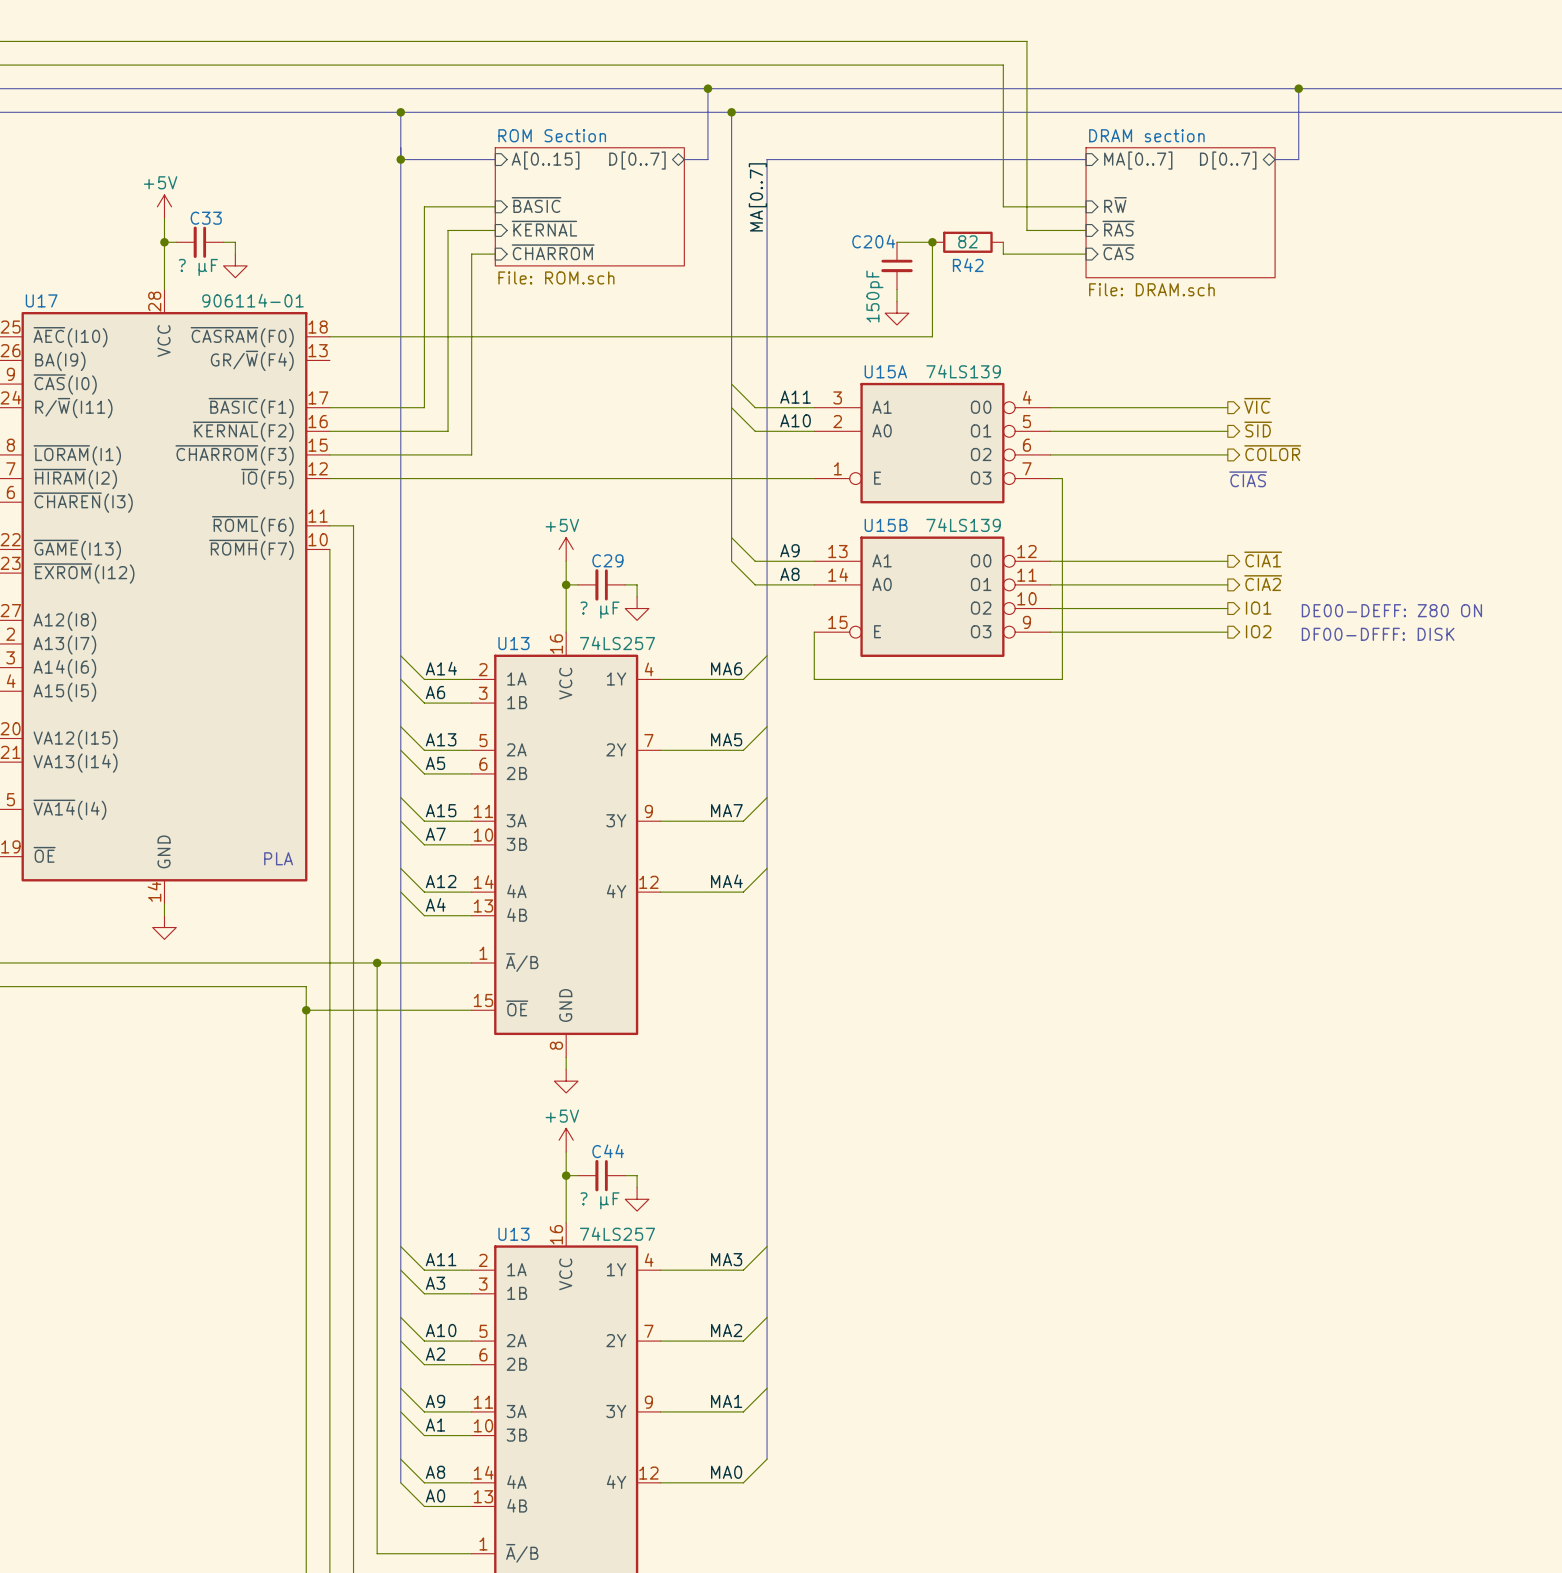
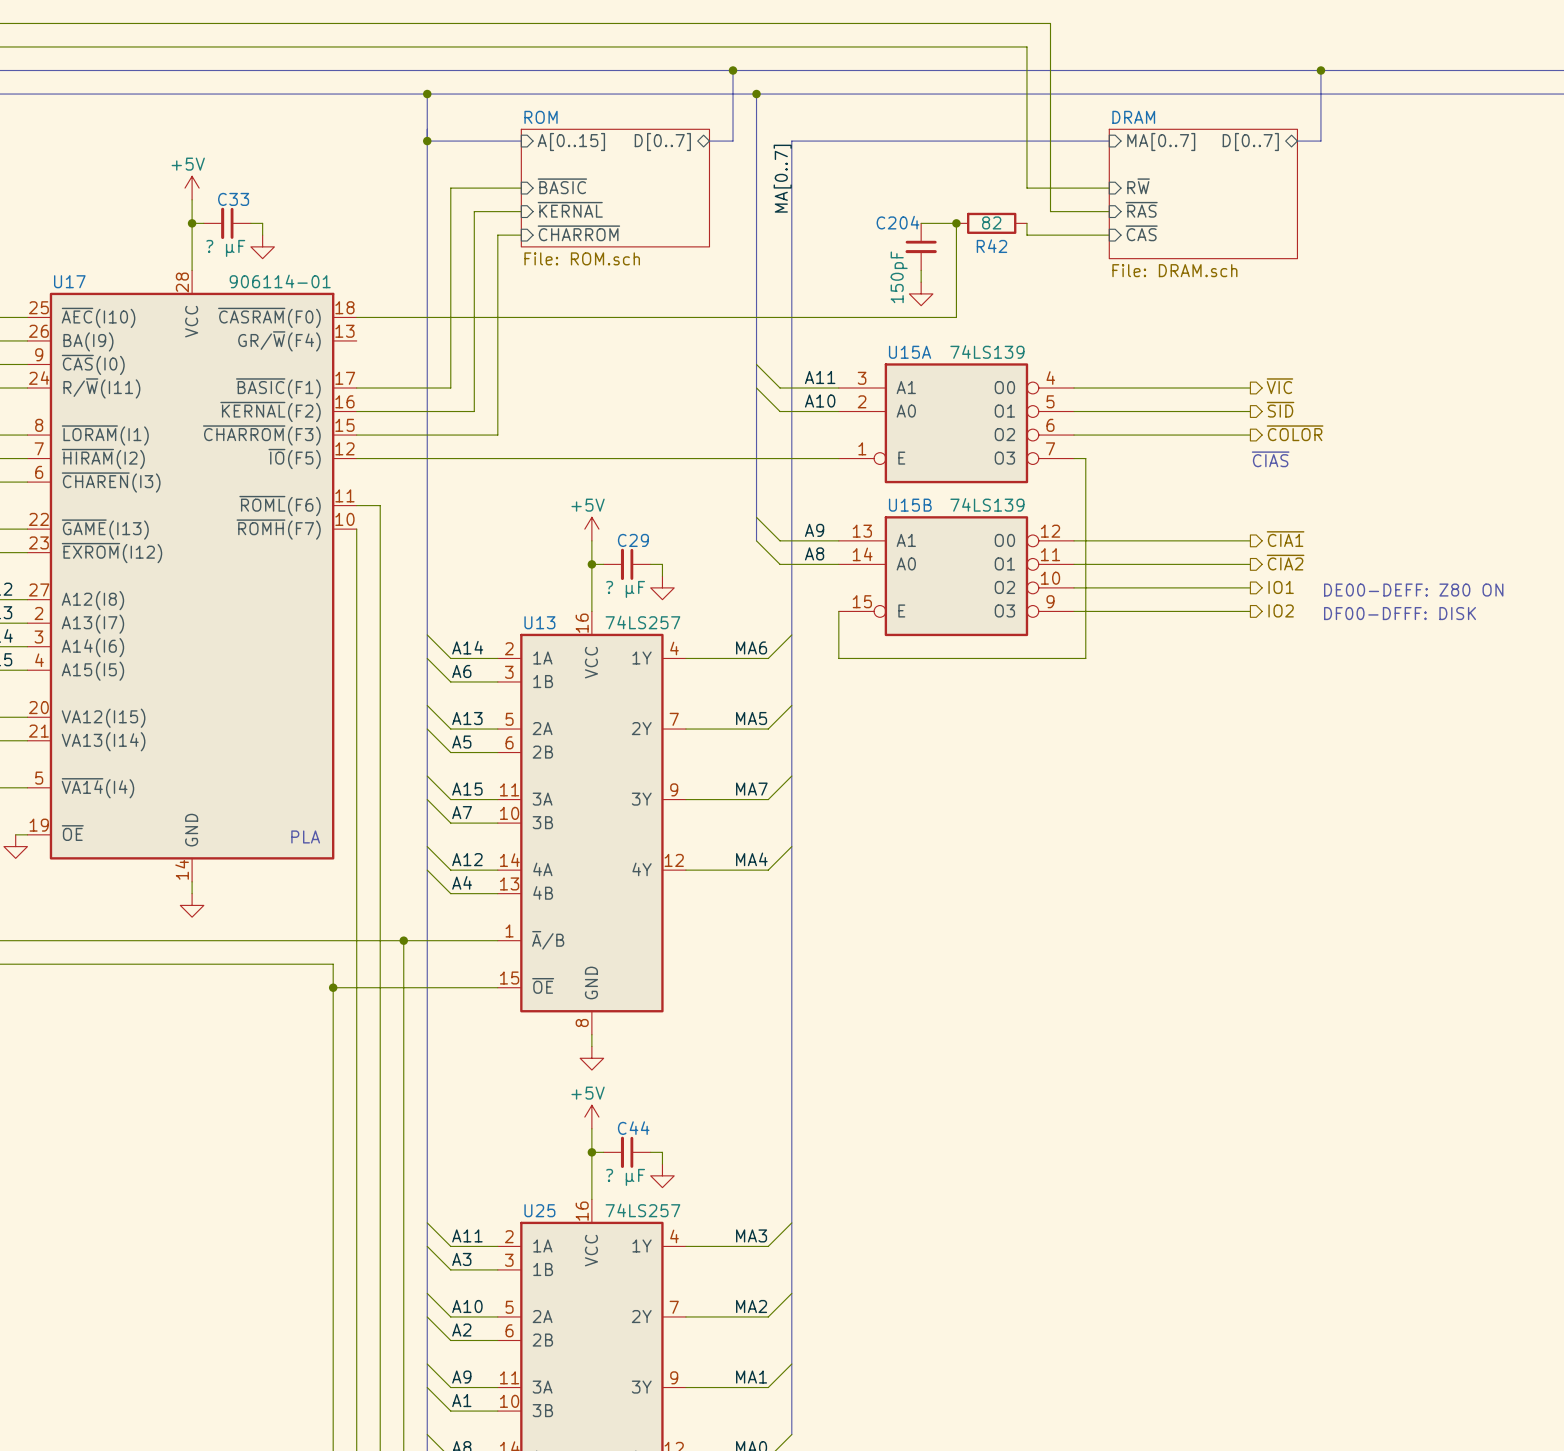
sheet ROM Section name: ROM Section (552, 135) -> ROM (541, 117)
sheet DRAM section name: DRAM section (1146, 135) -> DRAM (1133, 117)
U13 name: U13 (513, 1234) -> U25 (539, 1210)

